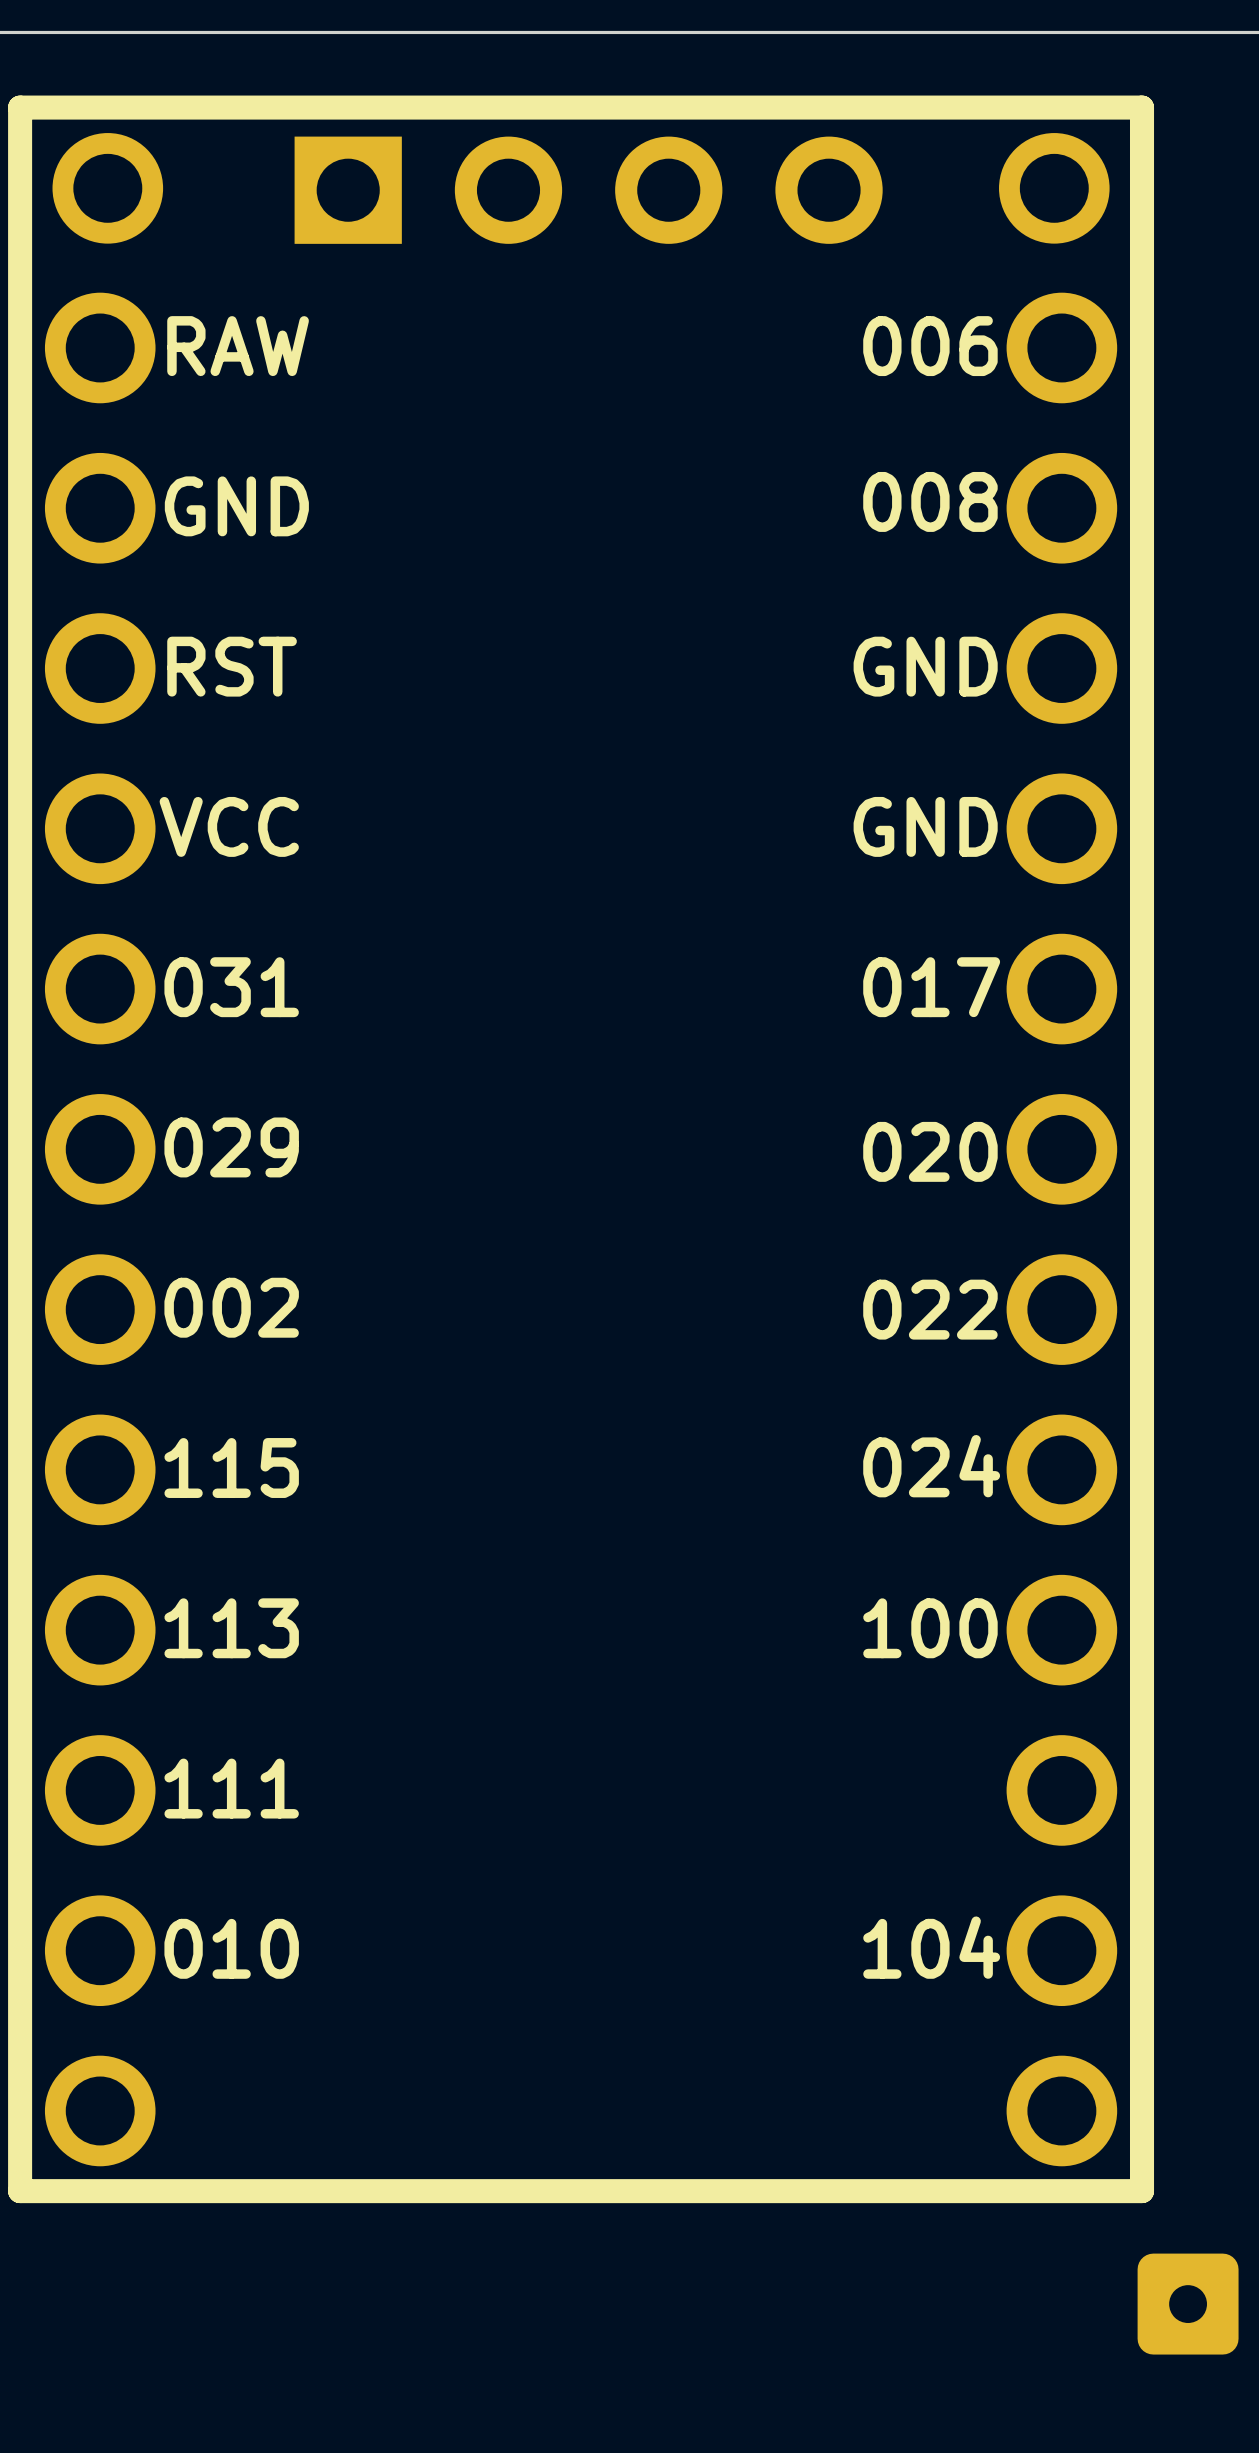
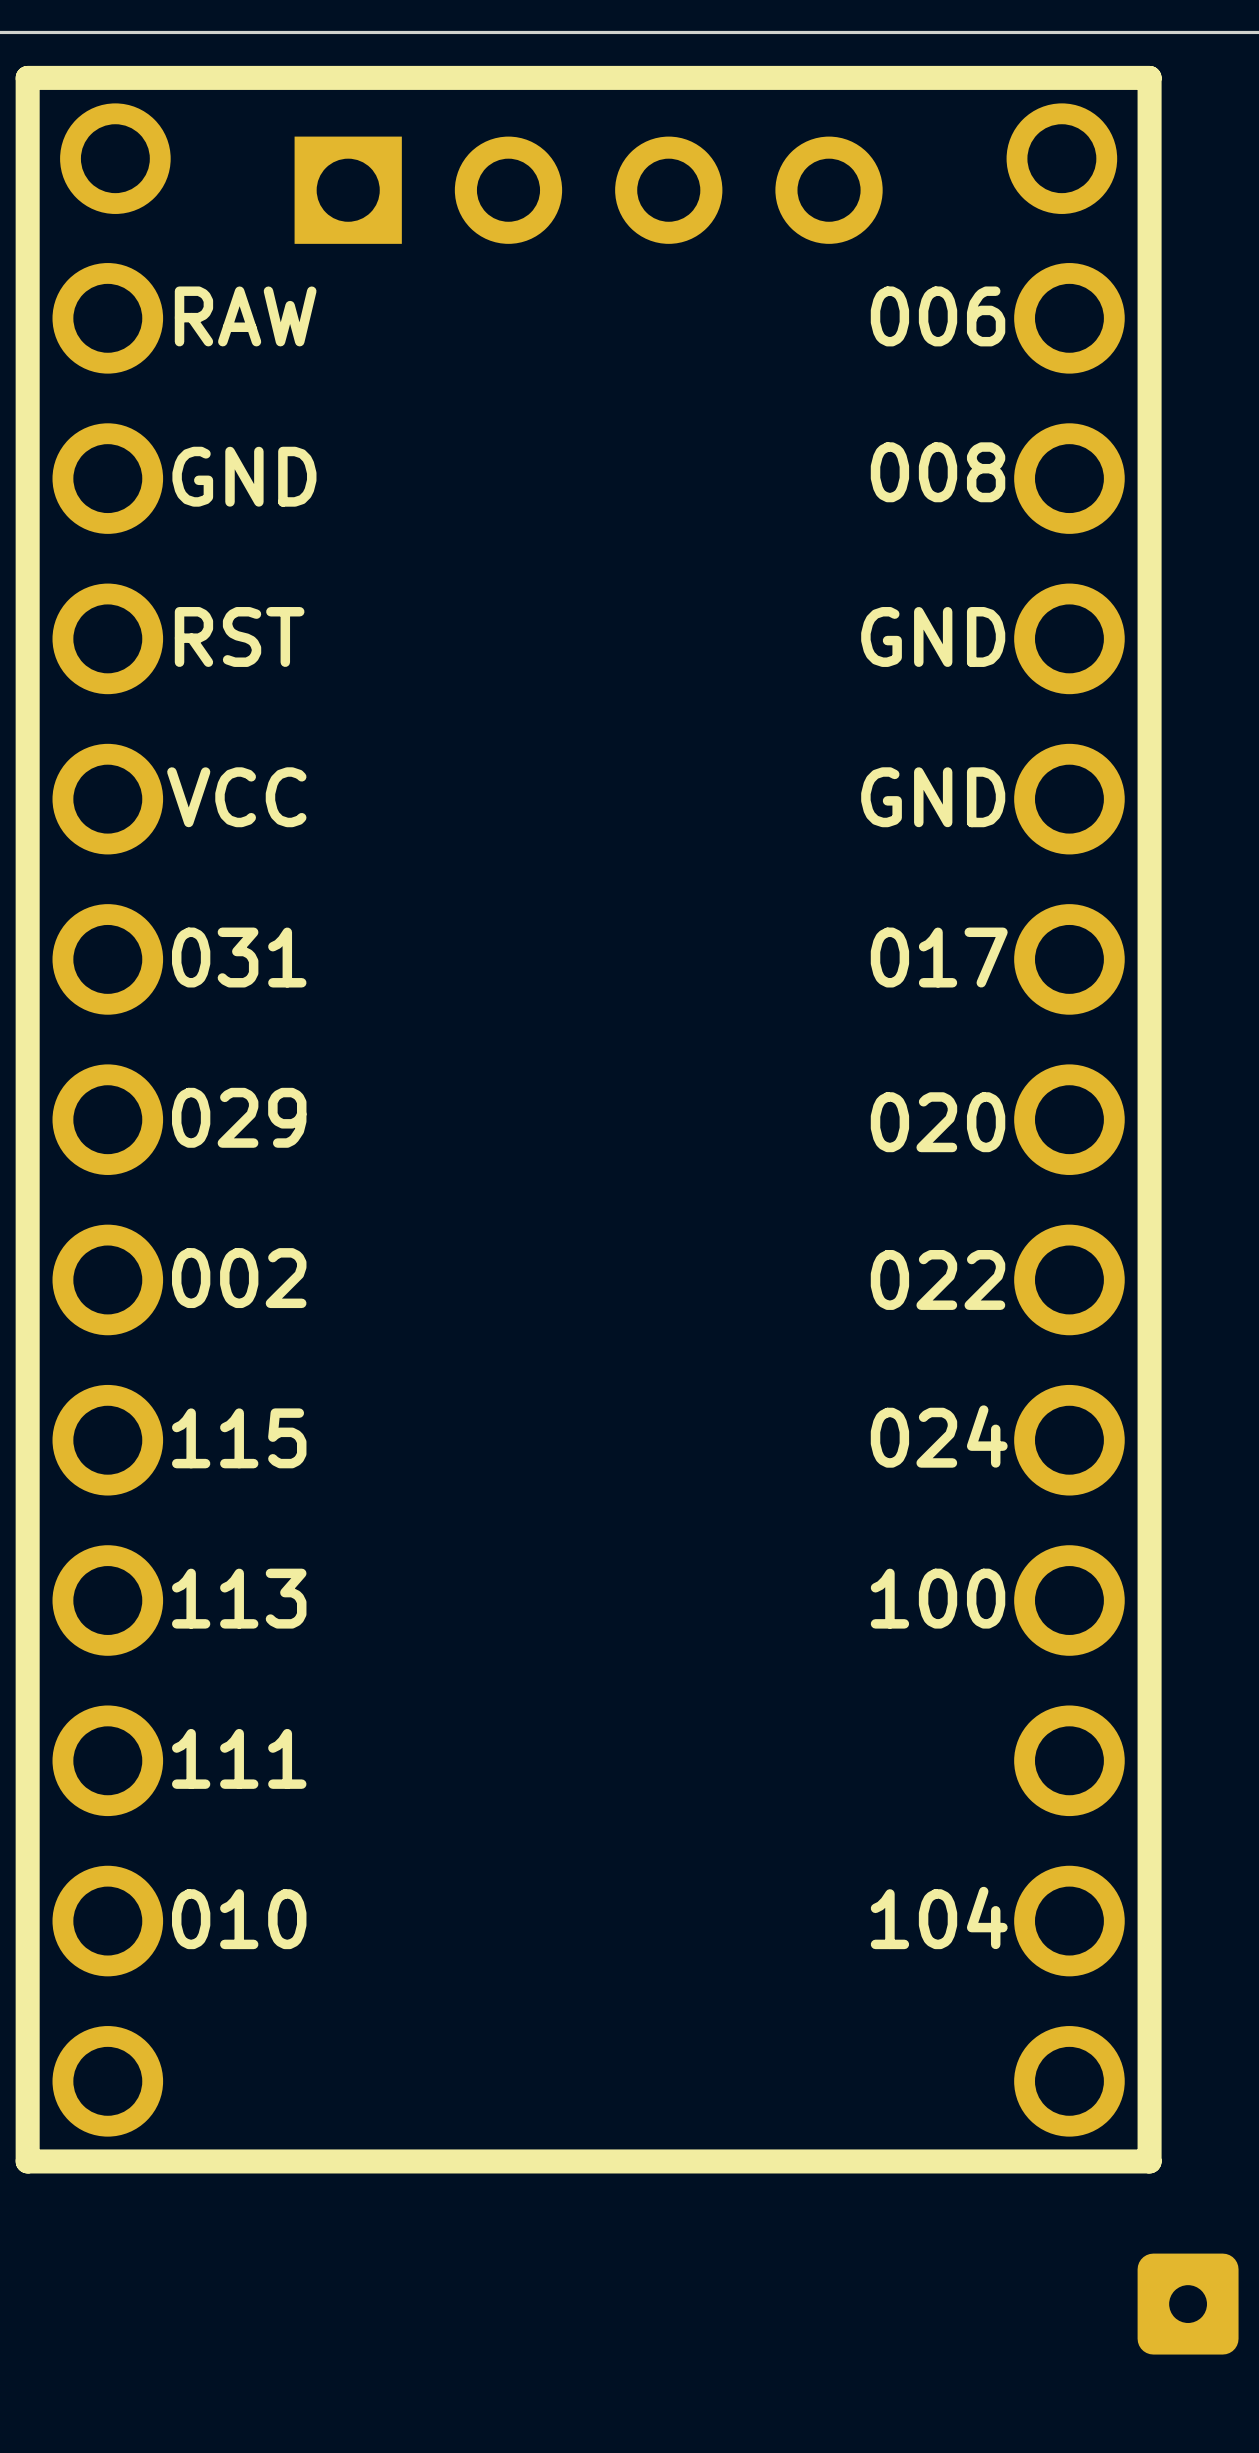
part position: (581, 1149) -> (588, 1119)

